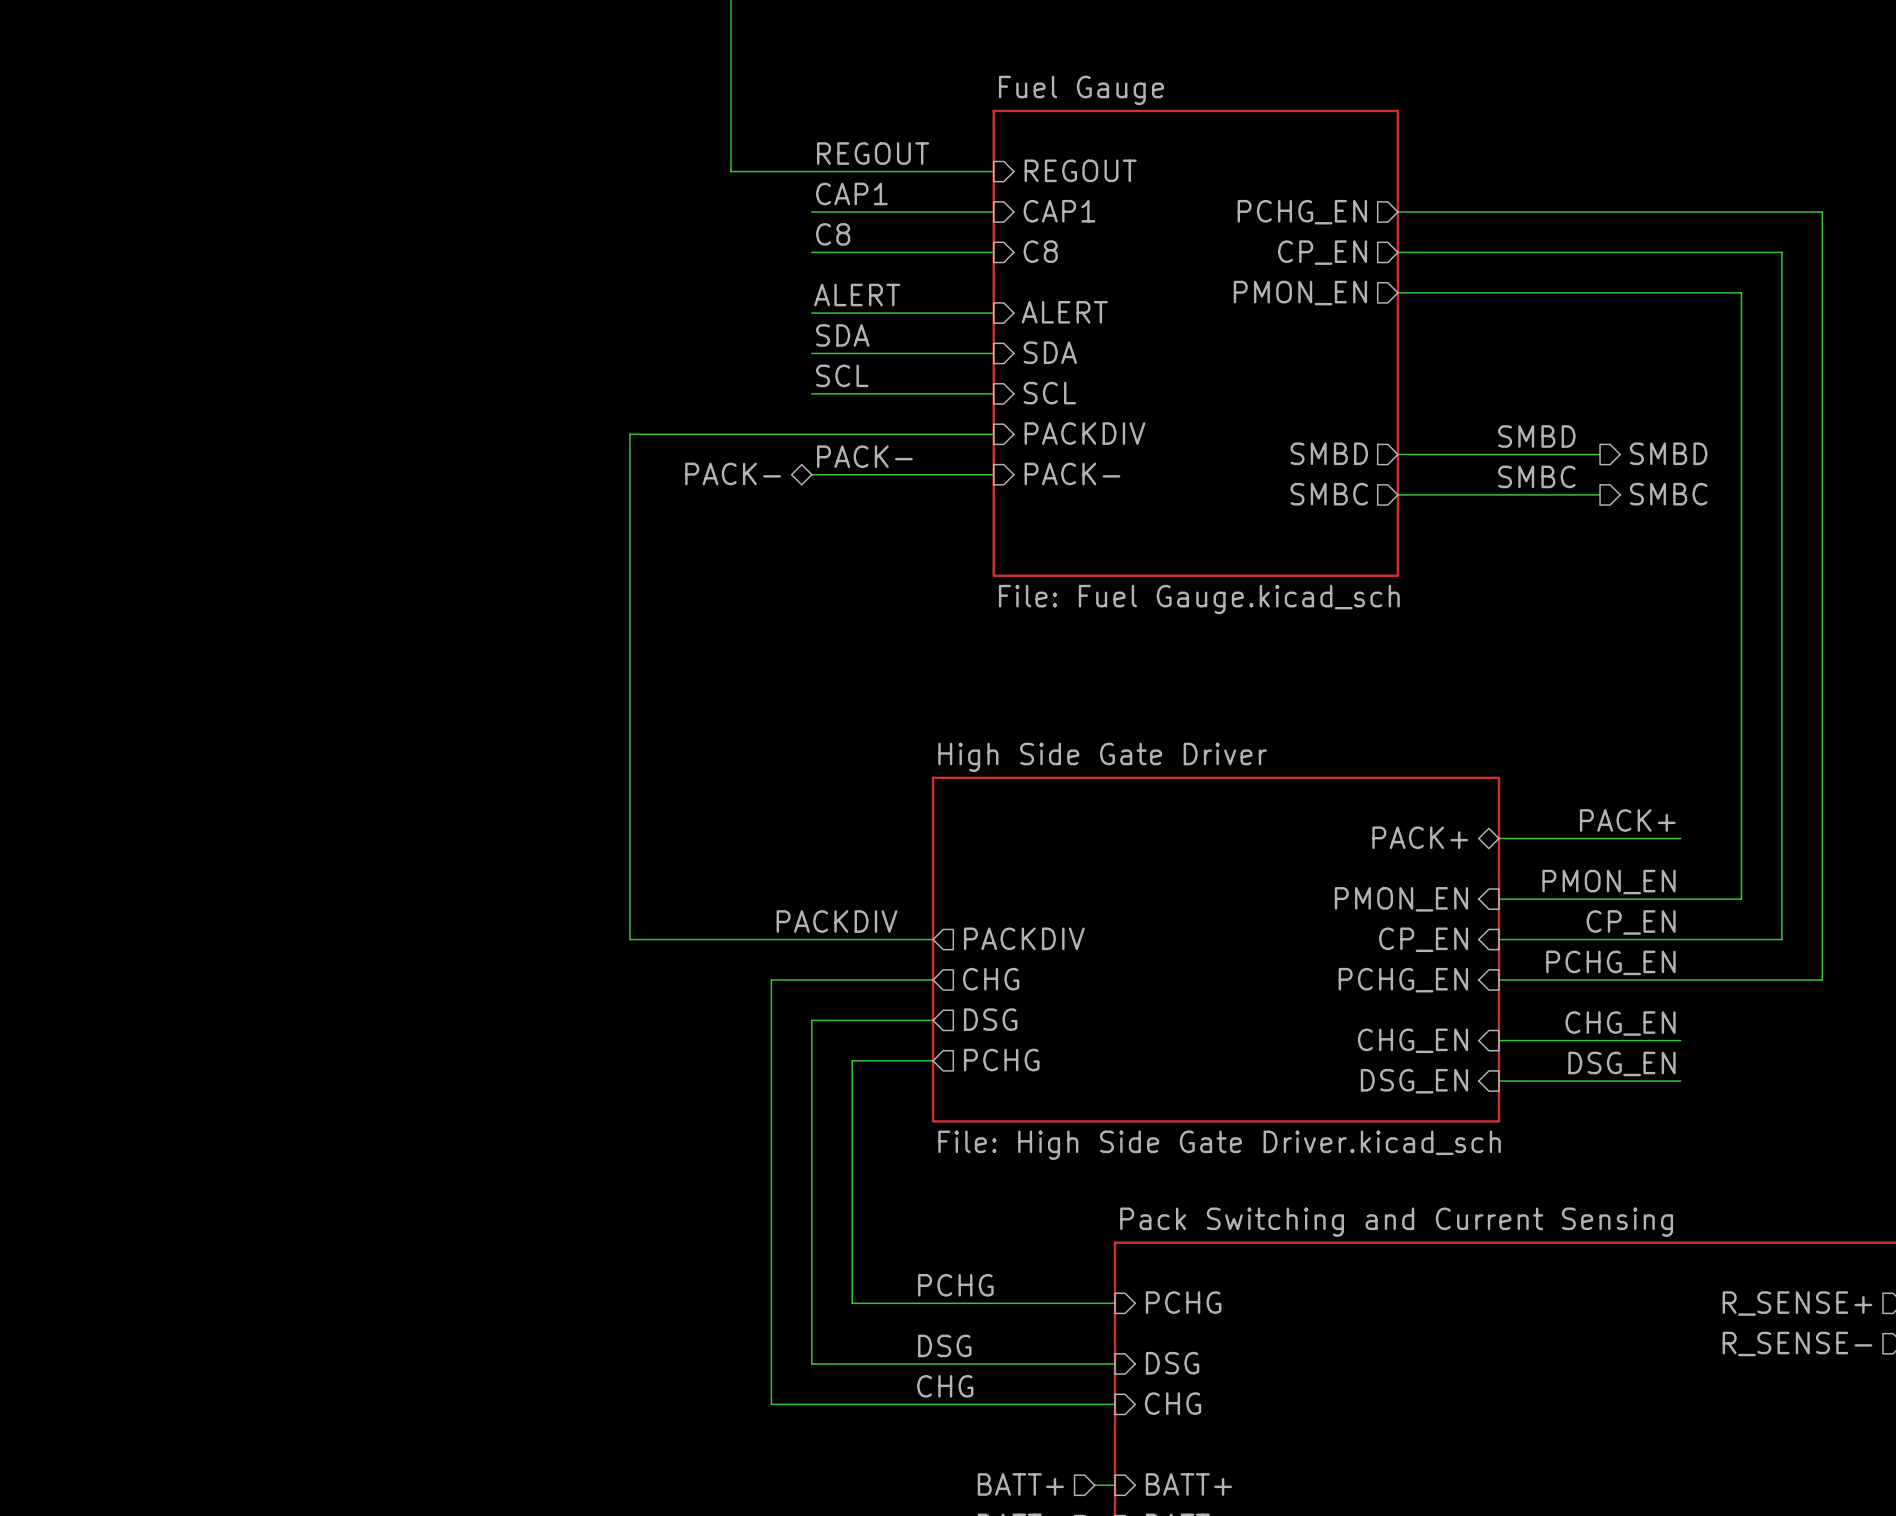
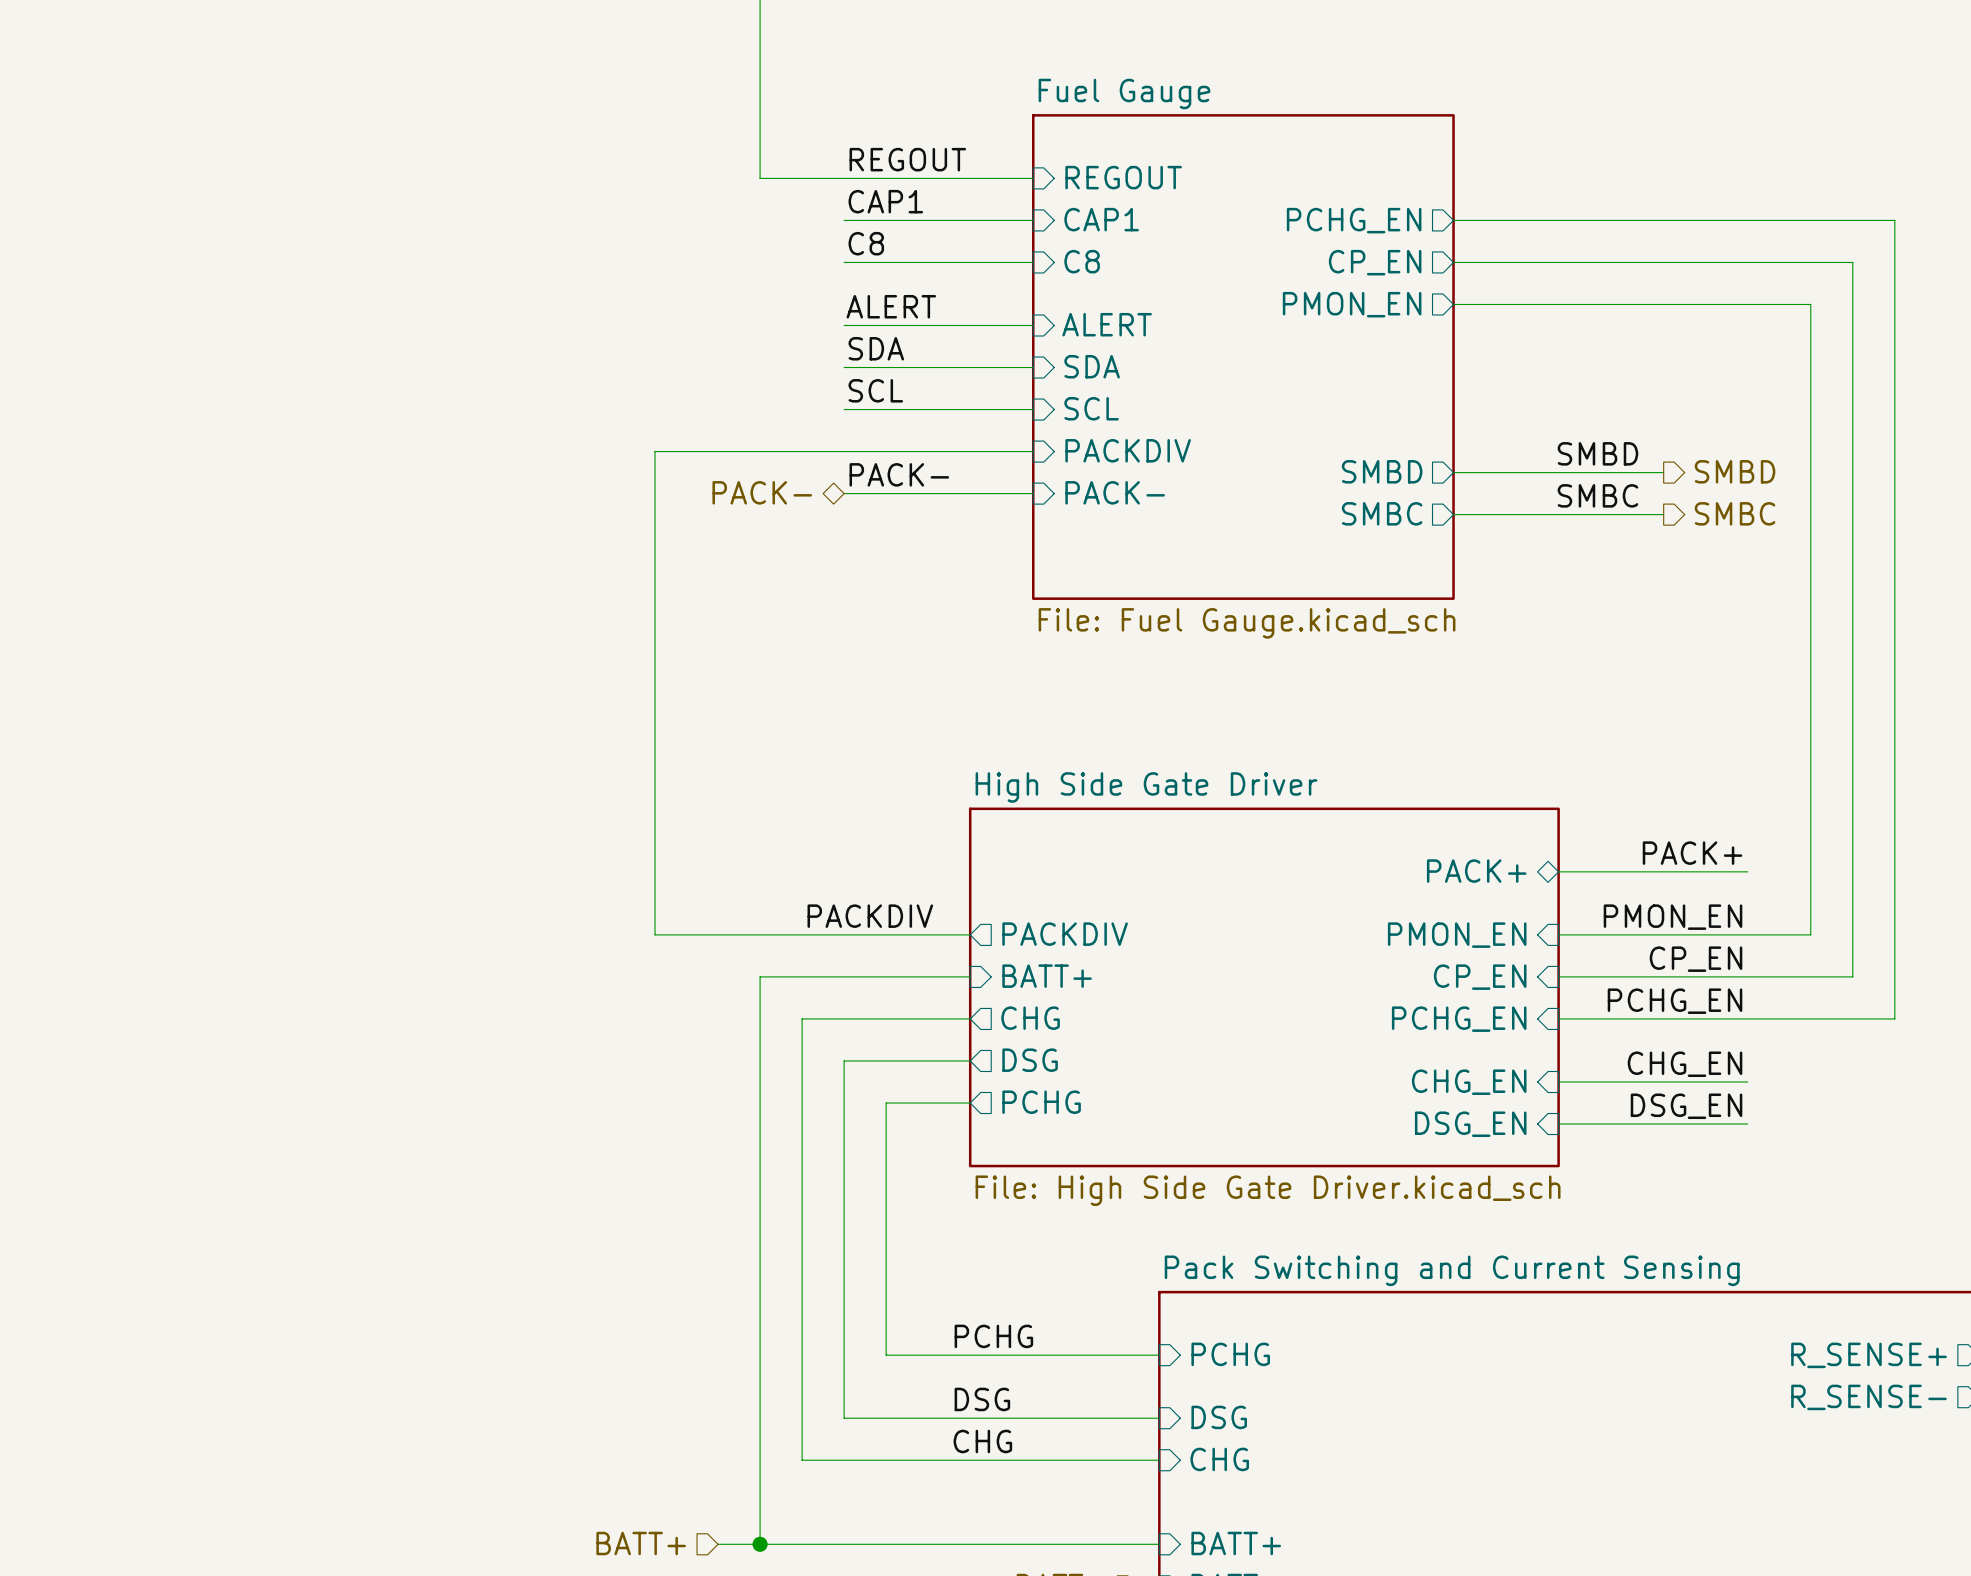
sheet pin: none -> PACKDIV (1065, 934)
wire: (629, 899) (629, 939) (730, 939) -> (655, 934) (970, 934)
label position: PACKDIV (837, 921) -> PACKDIV (870, 916)
sheet pin shape: output (1024, 938) -> input (1047, 976)
sheet pin: PACKDIV (1024, 938) -> BATT+ (1047, 976)
wire: none -> (760, 976) (760, 1544)
hierarchical label: none -> BATT+ (641, 1543)
hierarchical label: BATT+ (1020, 1484) -> none
wire: none -> (718, 1544) (1138, 1544)
junction: none -> (760, 1544)

